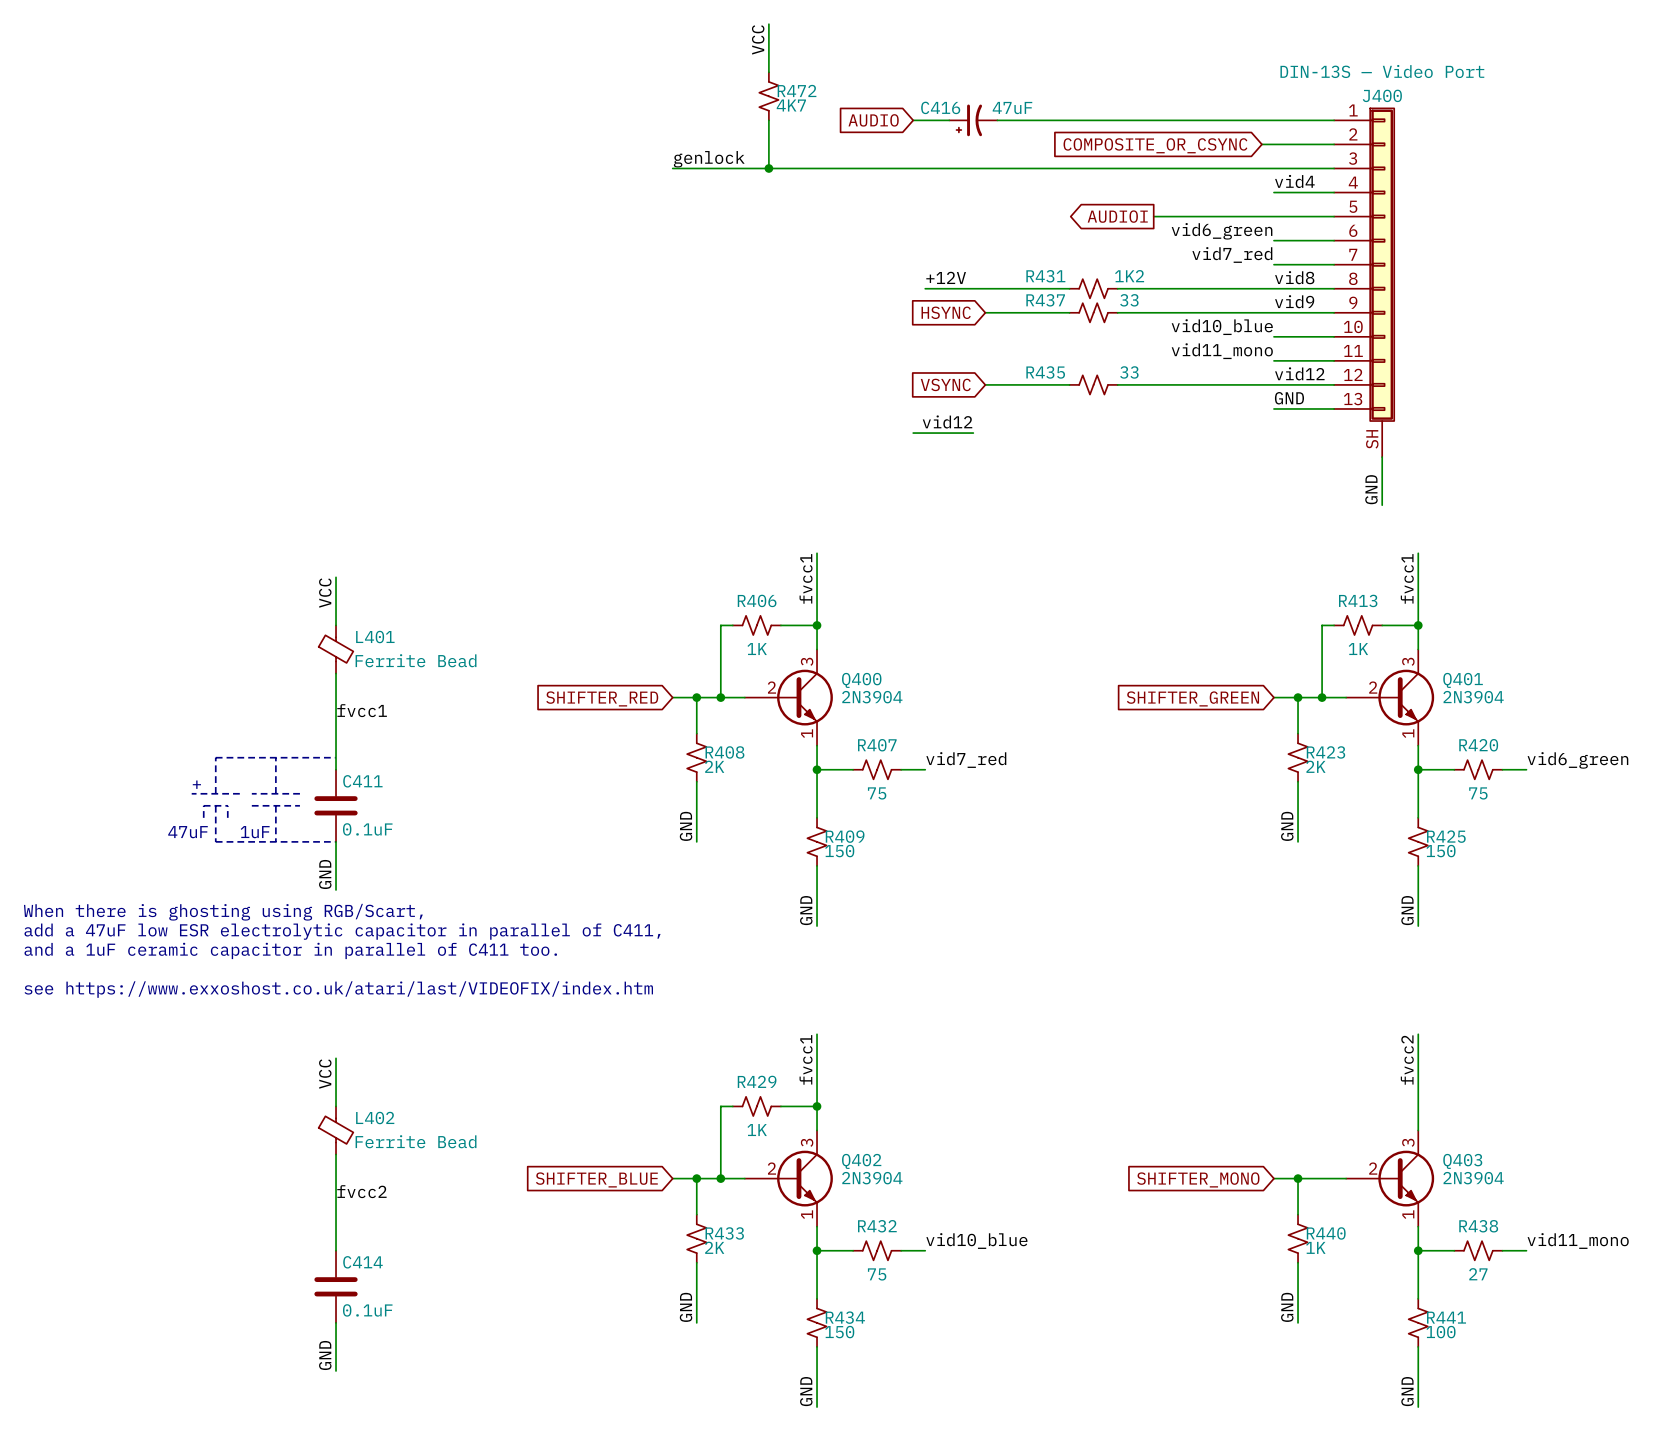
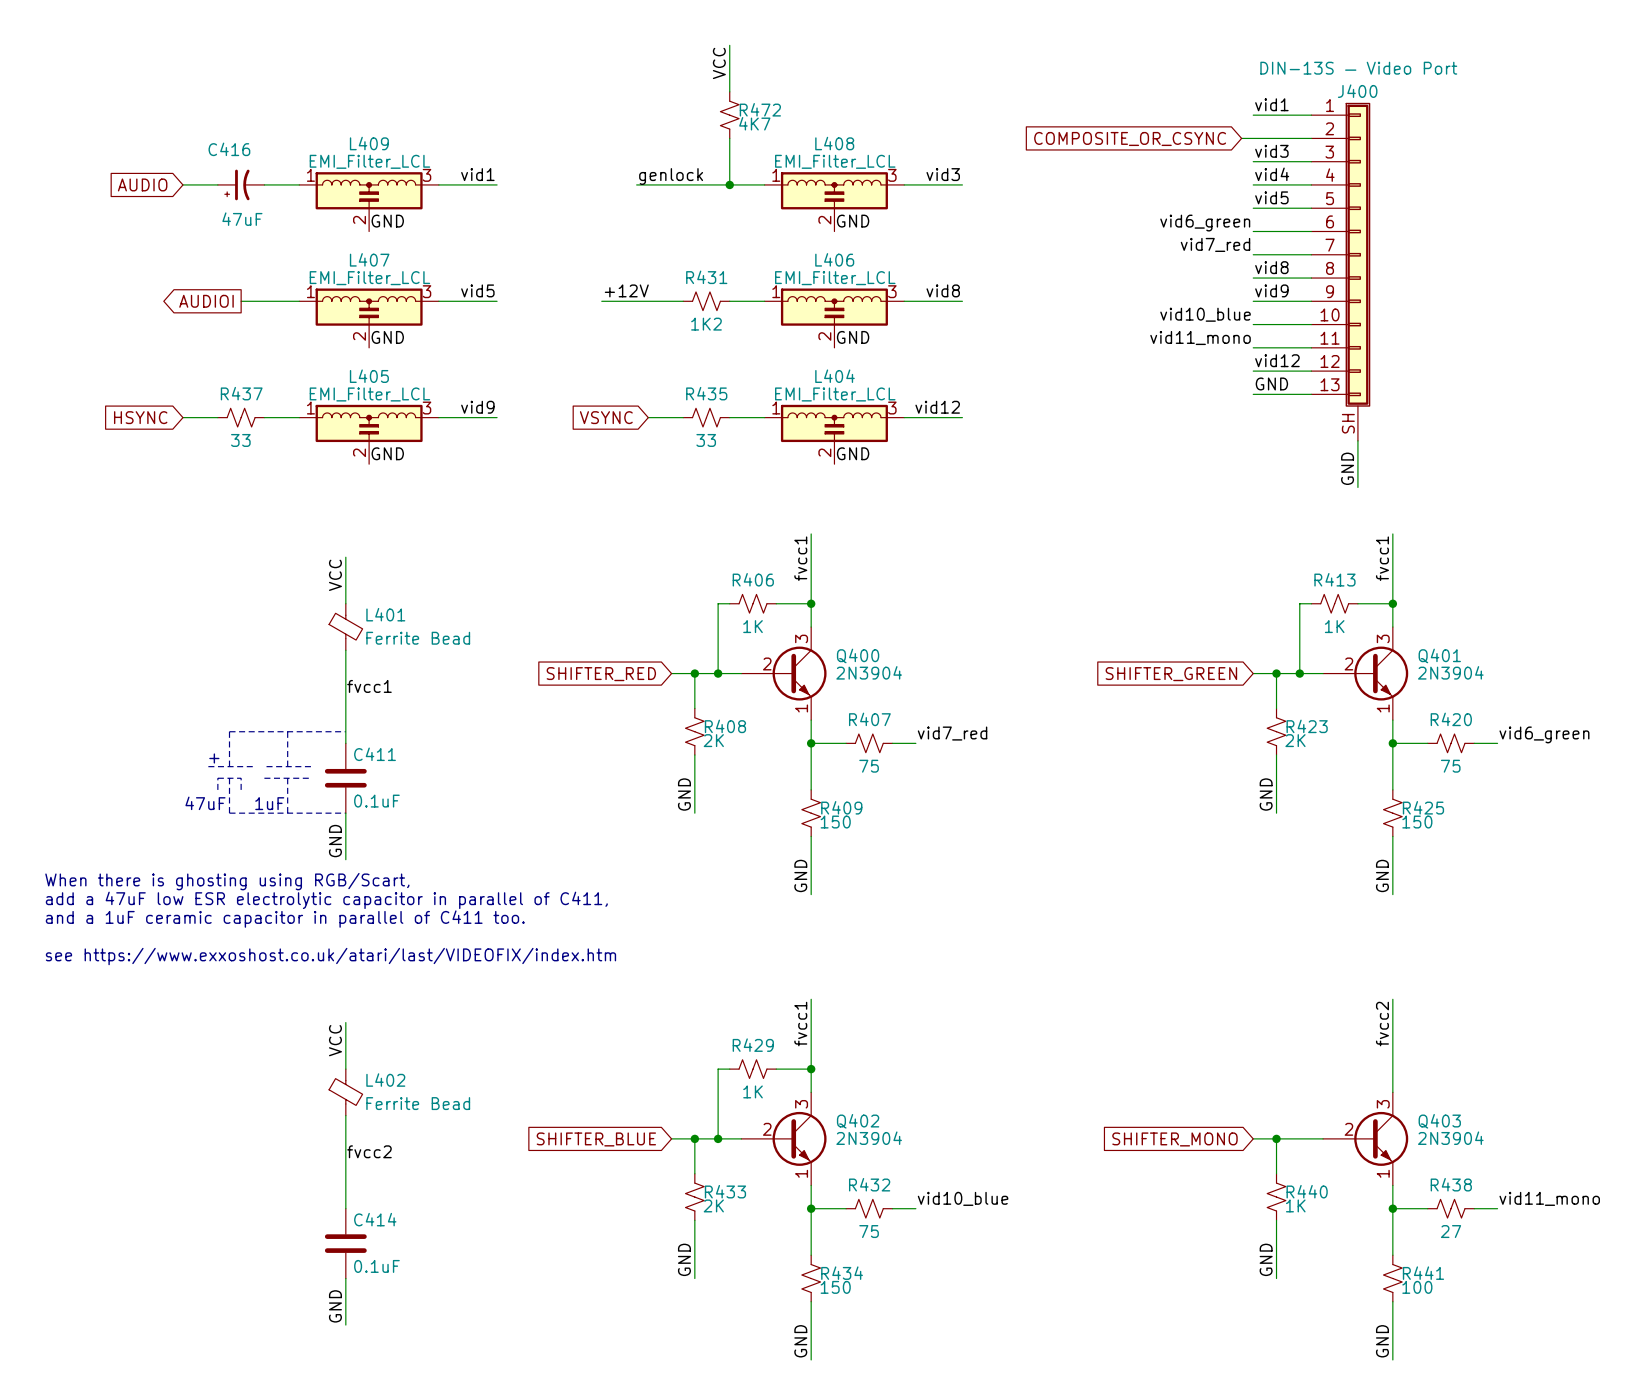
wire: (768, 24) (768, 72) -> (729, 45) (729, 91)
label position: VCC (758, 39) -> VCC (719, 63)
R472 position: (768, 96) -> (729, 115)
C416 name position: C416 (940, 107) -> C416 (229, 149)
C416 value position: 47uF (1012, 108) -> 47uF (242, 219)
label: none -> vid1 (1271, 104)
wire: (768, 120) (768, 168) -> (729, 138) (729, 184)
global label: AUDIO (873, 120) -> none
wire: (913, 120) (949, 120) -> none
C416 position: (973, 120) -> (241, 184)
wire: (997, 120) (1273, 120) -> none
label: none -> vid3 (1271, 151)
label position: genlock (709, 159) -> genlock (671, 176)
wire: (672, 168) (1273, 168) -> none
junction position: (768, 168) -> (729, 184)
label: none -> vid1 (477, 174)
label: none -> vid3 (943, 174)
global label: none -> AUDIO (142, 184)
wire: none -> (182, 184) (217, 184)
wire: none -> (264, 184) (299, 184)
wire: none -> (438, 184) (497, 184)
wire: none -> (636, 184) (764, 184)
wire: none -> (904, 184) (962, 184)
label: none -> vid5 (1271, 197)
L409: none -> EMI_Filter_LCL (369, 201)
L408: none -> EMI_Filter_LCL (834, 201)
global label: AUDIOI (1117, 216) -> none
wire: (1153, 216) (1273, 216) -> none
label: none -> GND (387, 221)
label: none -> GND (853, 221)
R431 name position: R431 (1045, 276) -> R431 (706, 277)
R431 value position: 1K2 (1129, 276) -> 1K2 (706, 324)
label: +12V (946, 277) -> none
wire: (925, 288) (1069, 288) -> none
R431 position: (1093, 288) -> (706, 301)
wire: (1117, 288) (1273, 288) -> none
R437 name position: R437 (1045, 300) -> R437 (241, 393)
R437 value position: 33 (1129, 300) -> 33 (240, 440)
label: none -> vid5 (477, 290)
label: none -> +12V (626, 290)
label: none -> vid8 (943, 290)
global label: none -> AUDIOI (206, 301)
wire: none -> (241, 301) (299, 301)
wire: none -> (438, 301) (497, 301)
wire: none -> (601, 301) (683, 301)
wire: none -> (729, 301) (764, 301)
wire: none -> (904, 301) (962, 301)
global label: HSYNC (946, 312) -> none
wire: (985, 312) (1069, 312) -> none
R437 position: (1093, 312) -> (241, 417)
wire: (1117, 312) (1273, 312) -> none
L407: none -> EMI_Filter_LCL (369, 318)
L406: none -> EMI_Filter_LCL (834, 318)
label: none -> GND (387, 337)
label: none -> GND (853, 337)
R435 name position: R435 (1045, 372) -> R435 (706, 393)
R435 value position: 33 (1129, 372) -> 33 (706, 440)
global label: VSYNC (945, 384) -> none
wire: (985, 384) (1069, 384) -> none
R435 position: (1093, 384) -> (706, 417)
wire: (1117, 384) (1273, 384) -> none
label: none -> vid9 (477, 407)
global label: none -> HSYNC (140, 417)
wire: none -> (182, 417) (217, 417)
wire: none -> (264, 417) (299, 417)
wire: none -> (438, 417) (497, 417)
global label: none -> VSYNC (606, 417)
wire: none -> (648, 417) (683, 417)
wire: none -> (729, 417) (764, 417)
L405: none -> EMI_Filter_LCL (369, 434)
L404: none -> EMI_Filter_LCL (834, 434)
label: none -> GND (387, 453)
label: none -> GND (853, 453)

